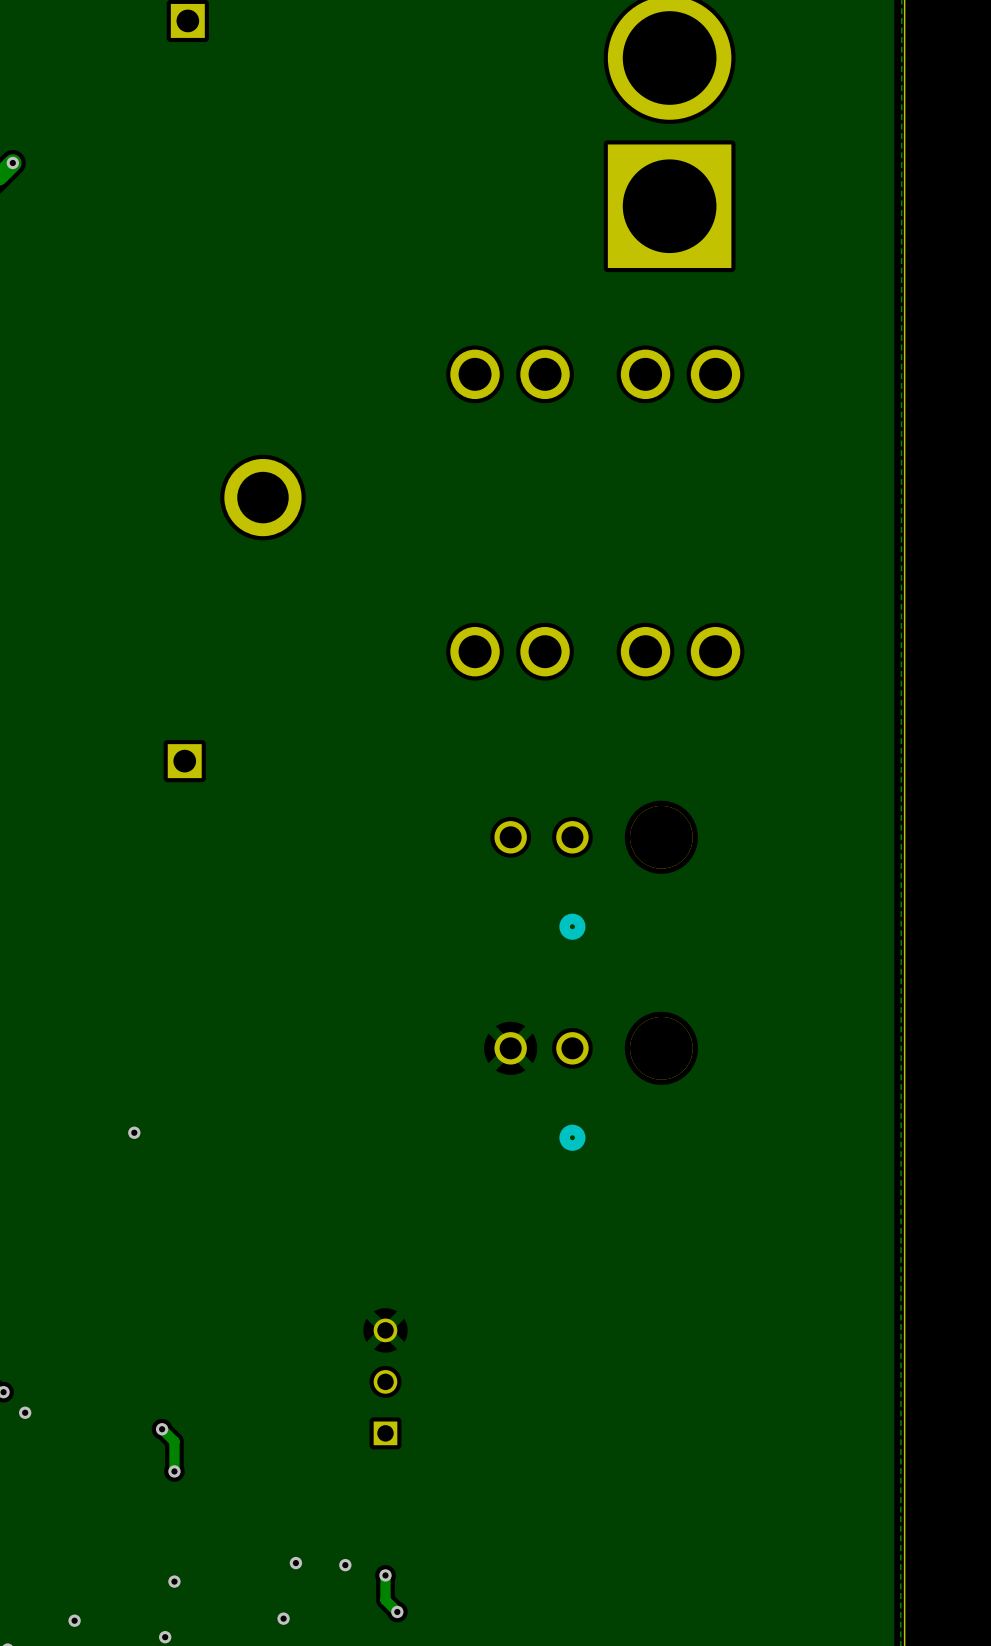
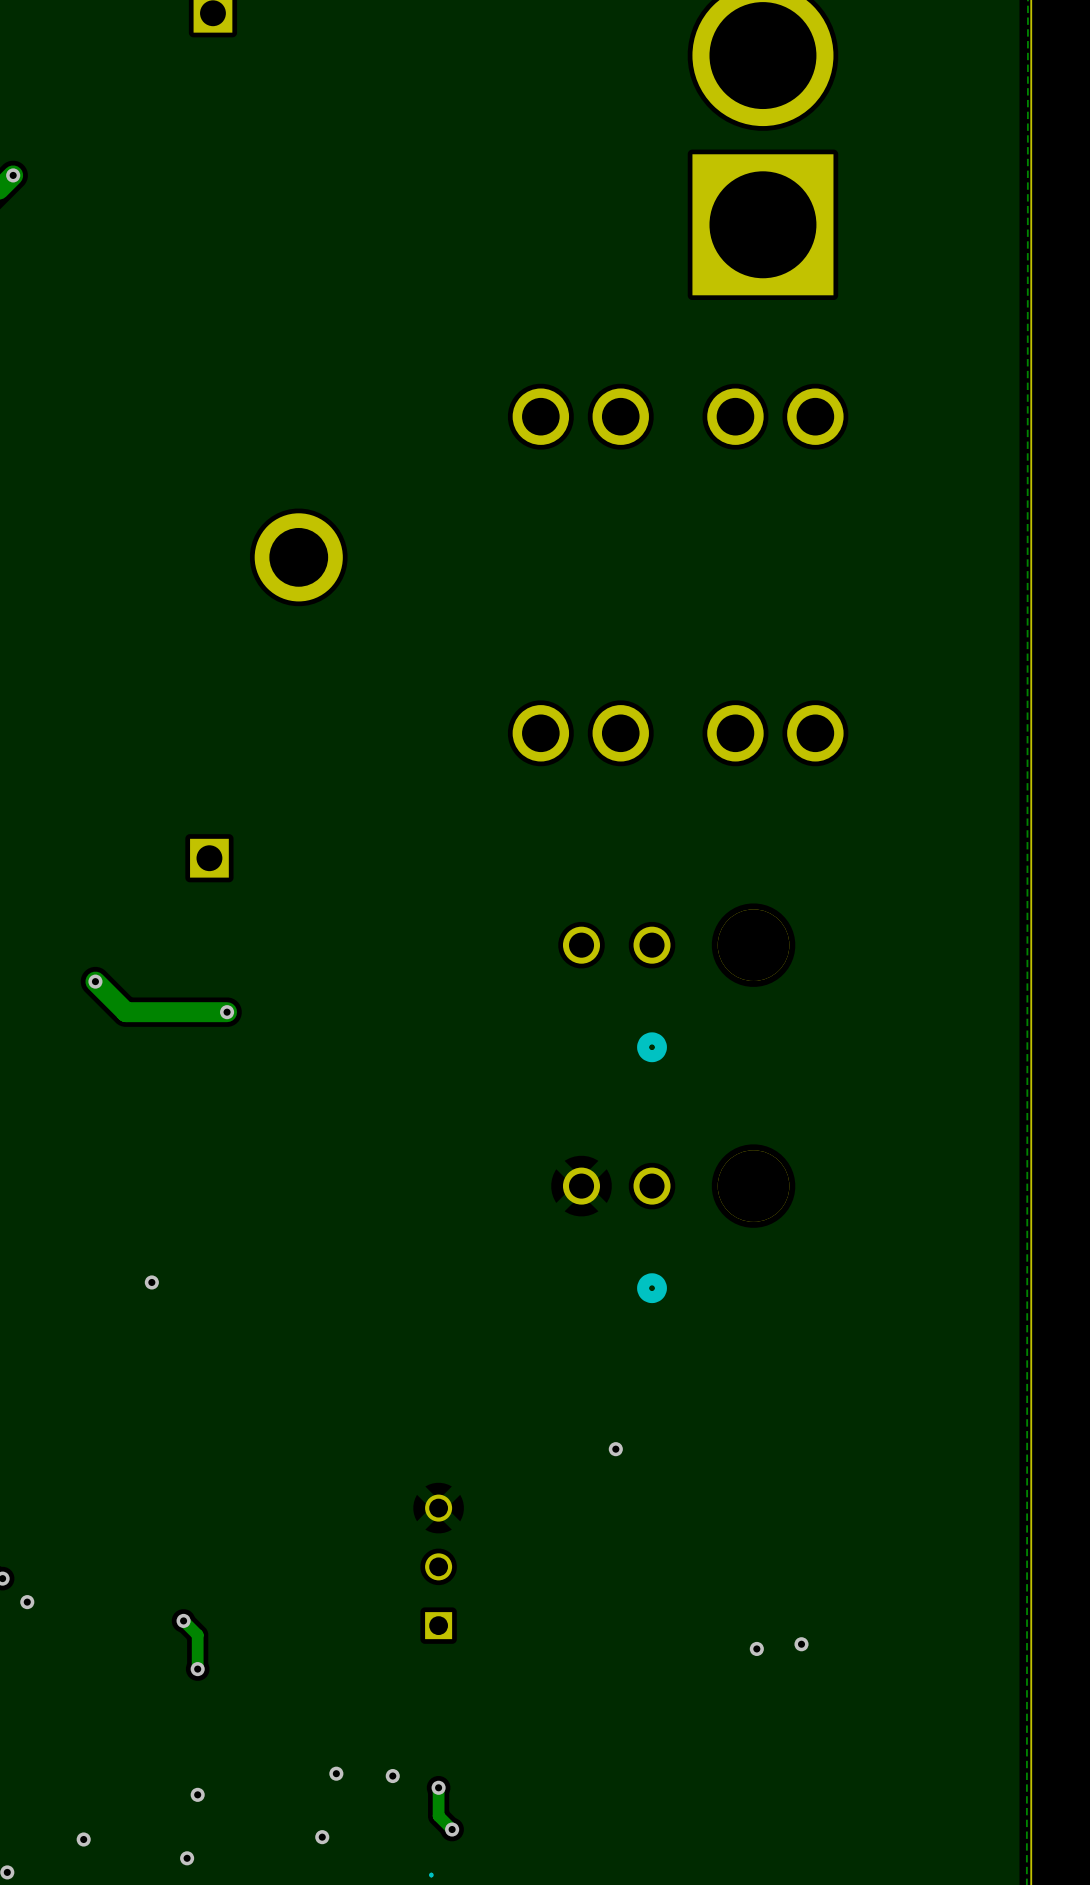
track: none -> (95, 981) (126, 1012) (227, 1012)
via: none -> (95, 981)
via: none -> (227, 1012)
via: none -> (615, 1449)
via: none -> (801, 1644)
via: none -> (756, 1648)

